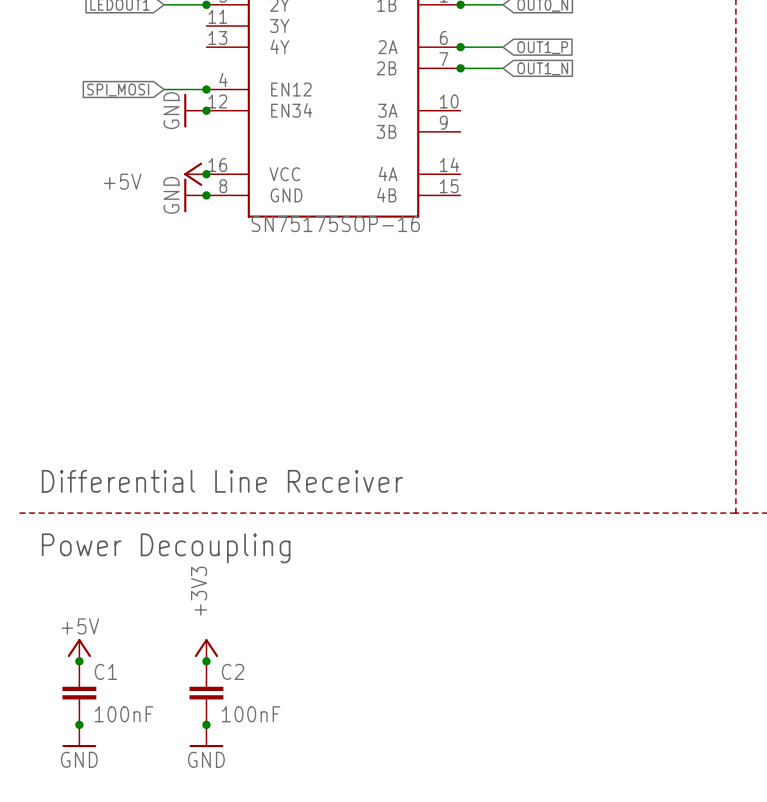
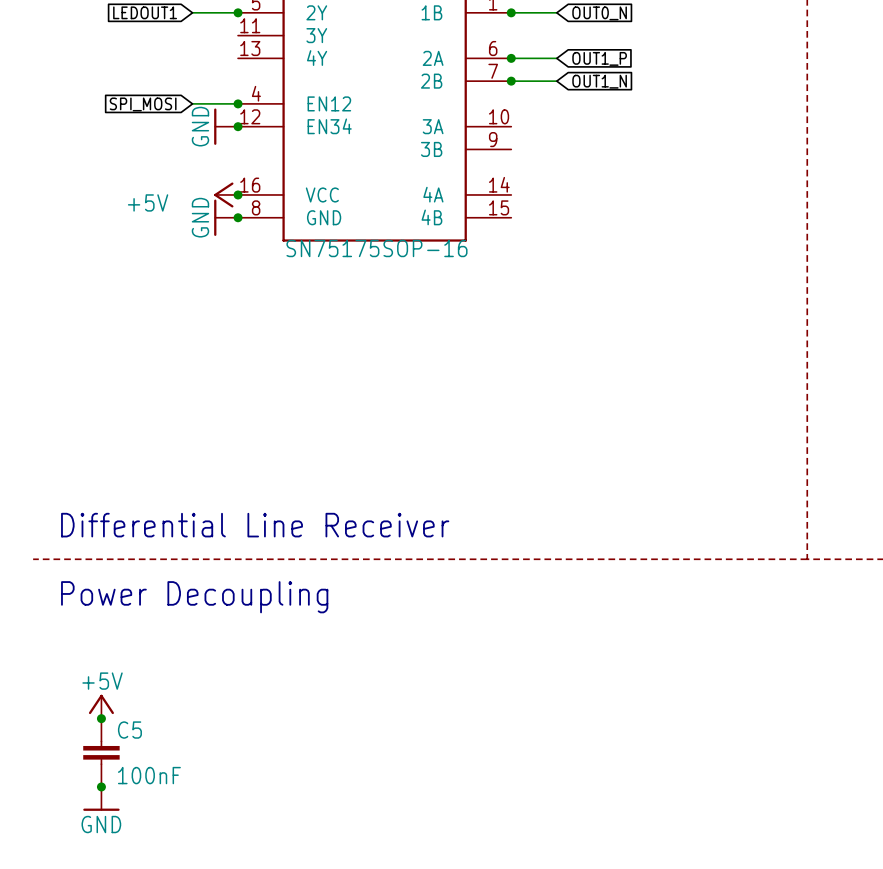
power symbol: +3V3 (206, 650) -> none
junction: (206, 661) -> none
C1 name: C1 (105, 671) -> C5 (129, 730)
C2: 100nF (206, 693) -> none
junction: (206, 724) -> none
power symbol: GND (206, 735) -> none

